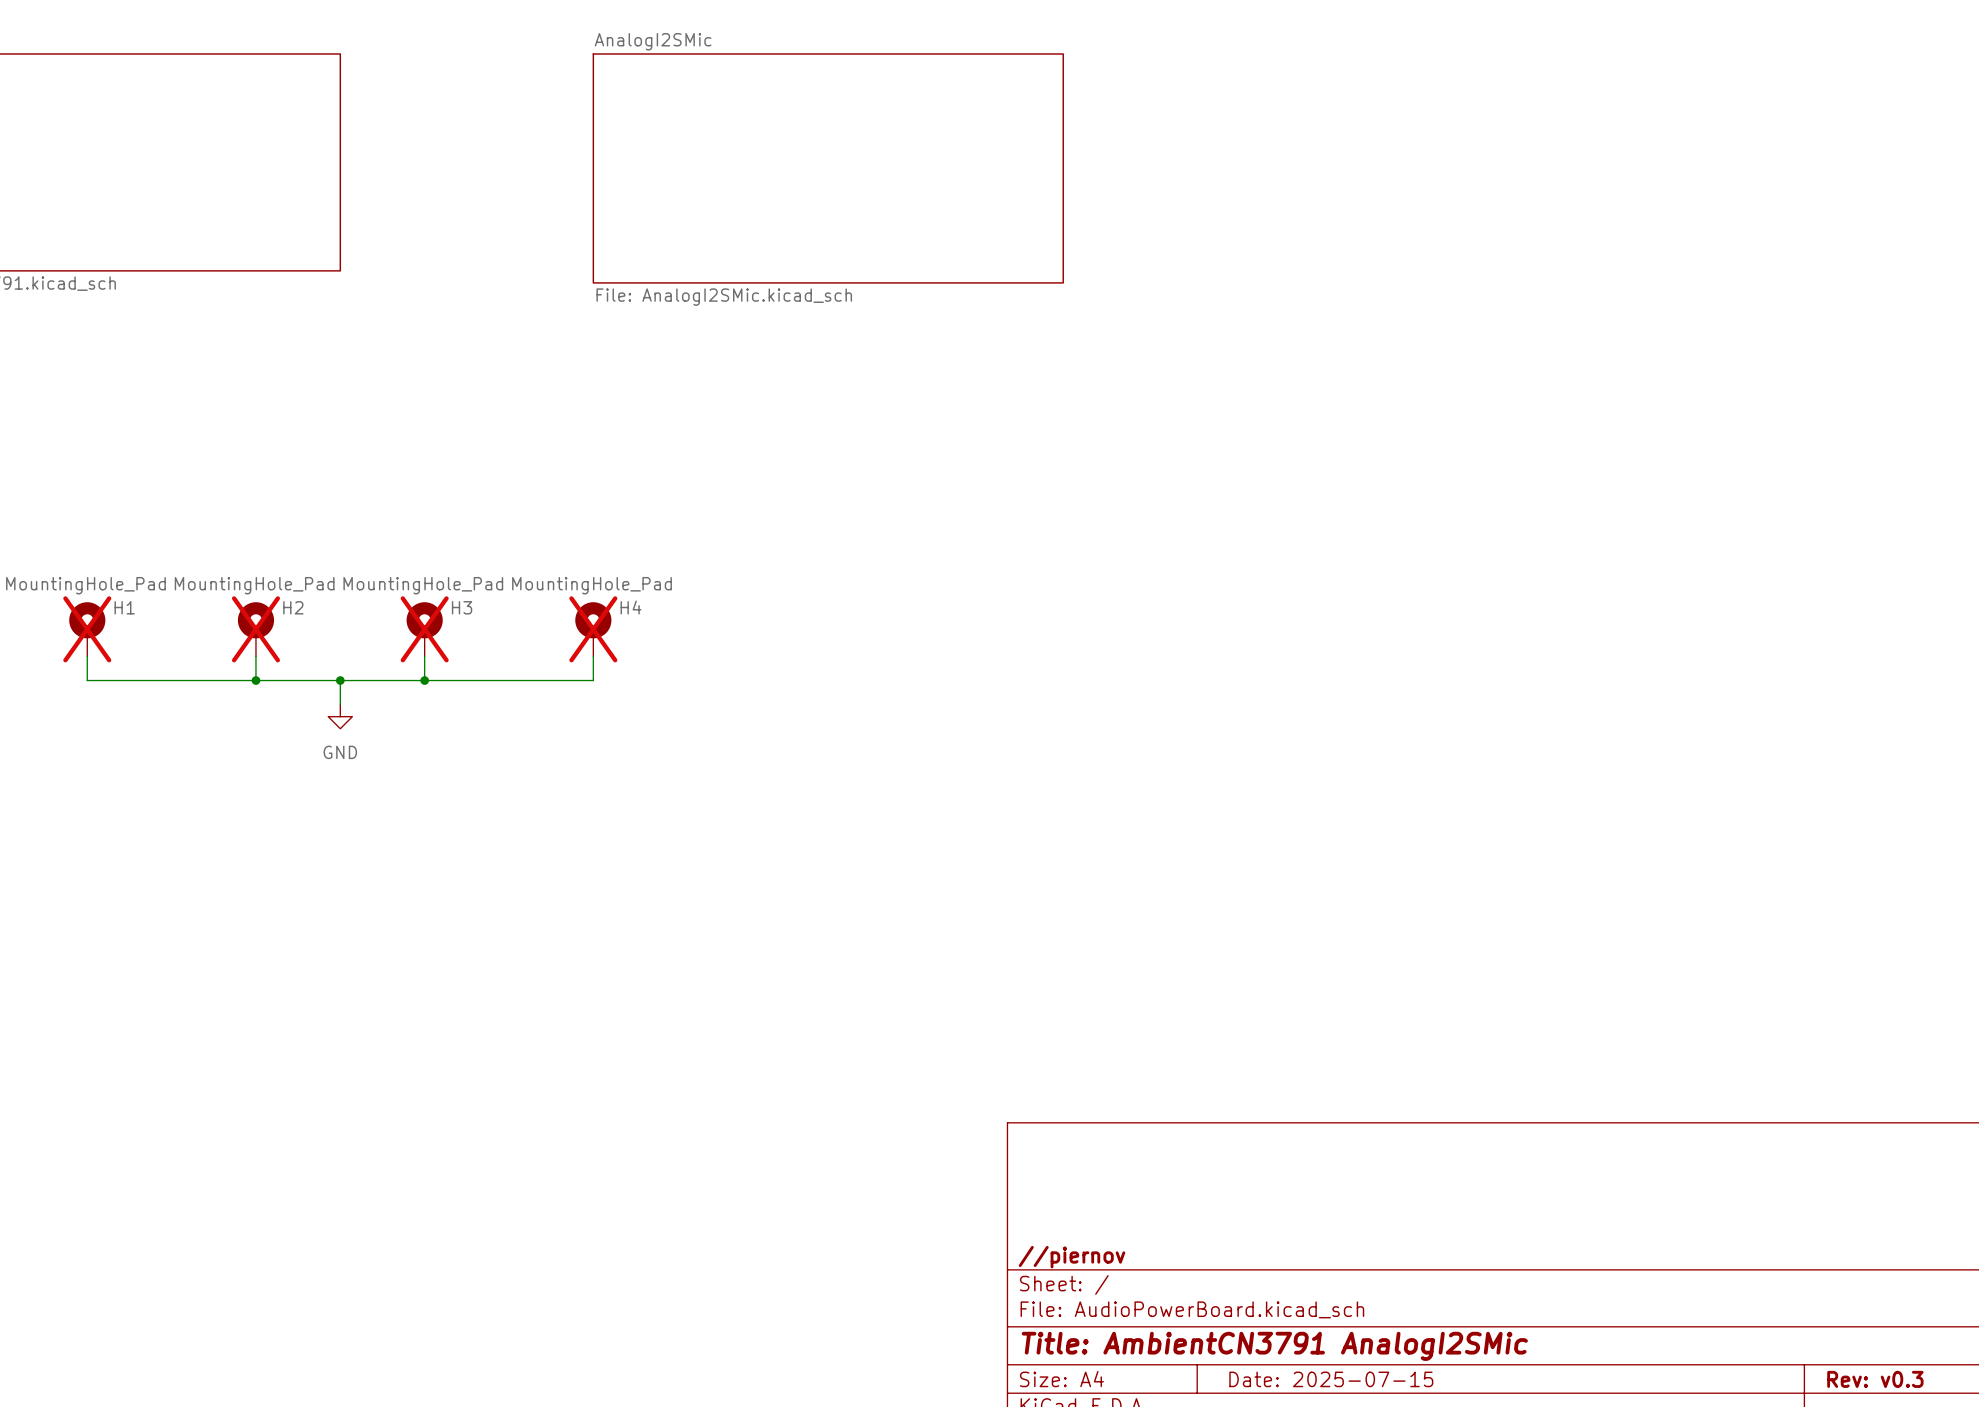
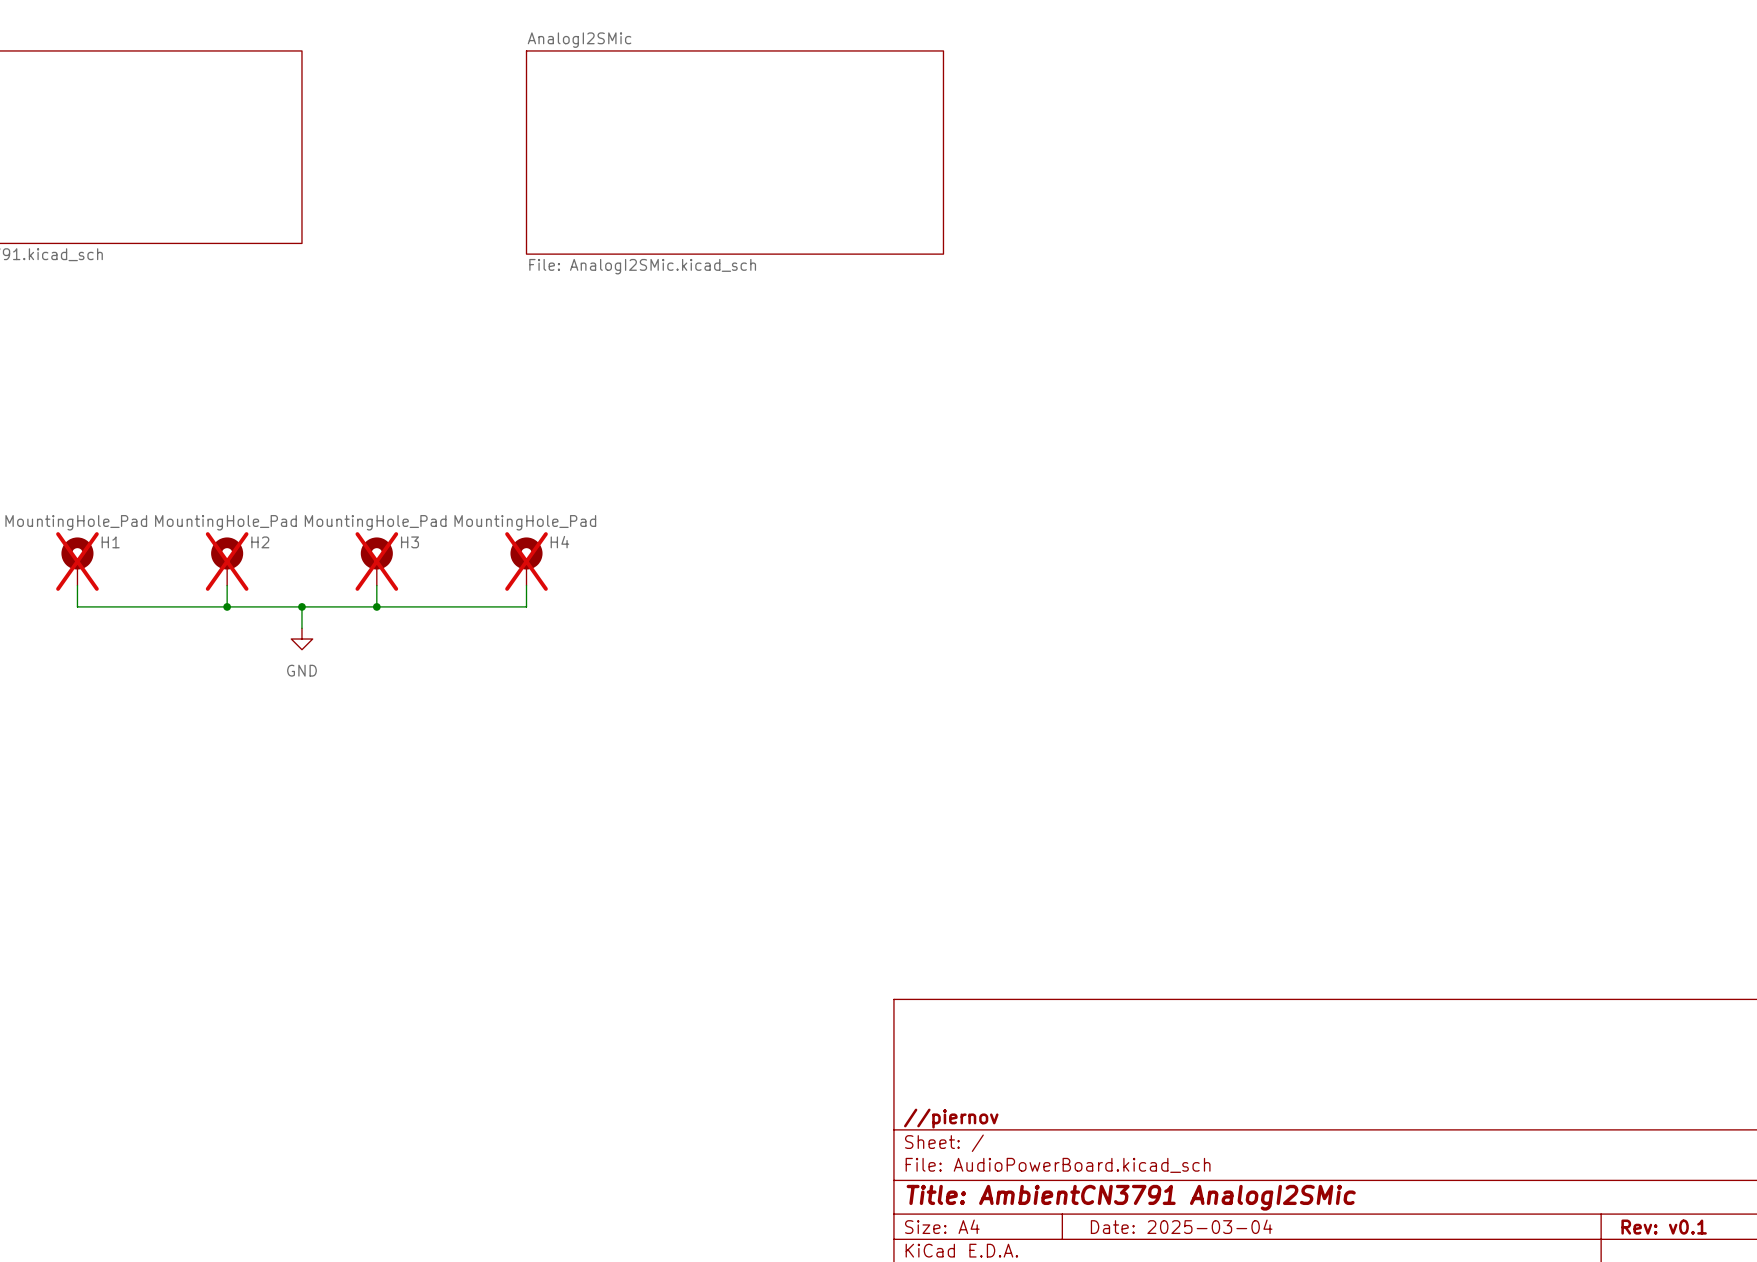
title block: Date: 2025-07-15 (1331, 1379) -> Date: 2025-03-04 (1181, 1226)
title block: Rev: v0.3 (1875, 1379) -> Rev: v0.1 (1664, 1227)

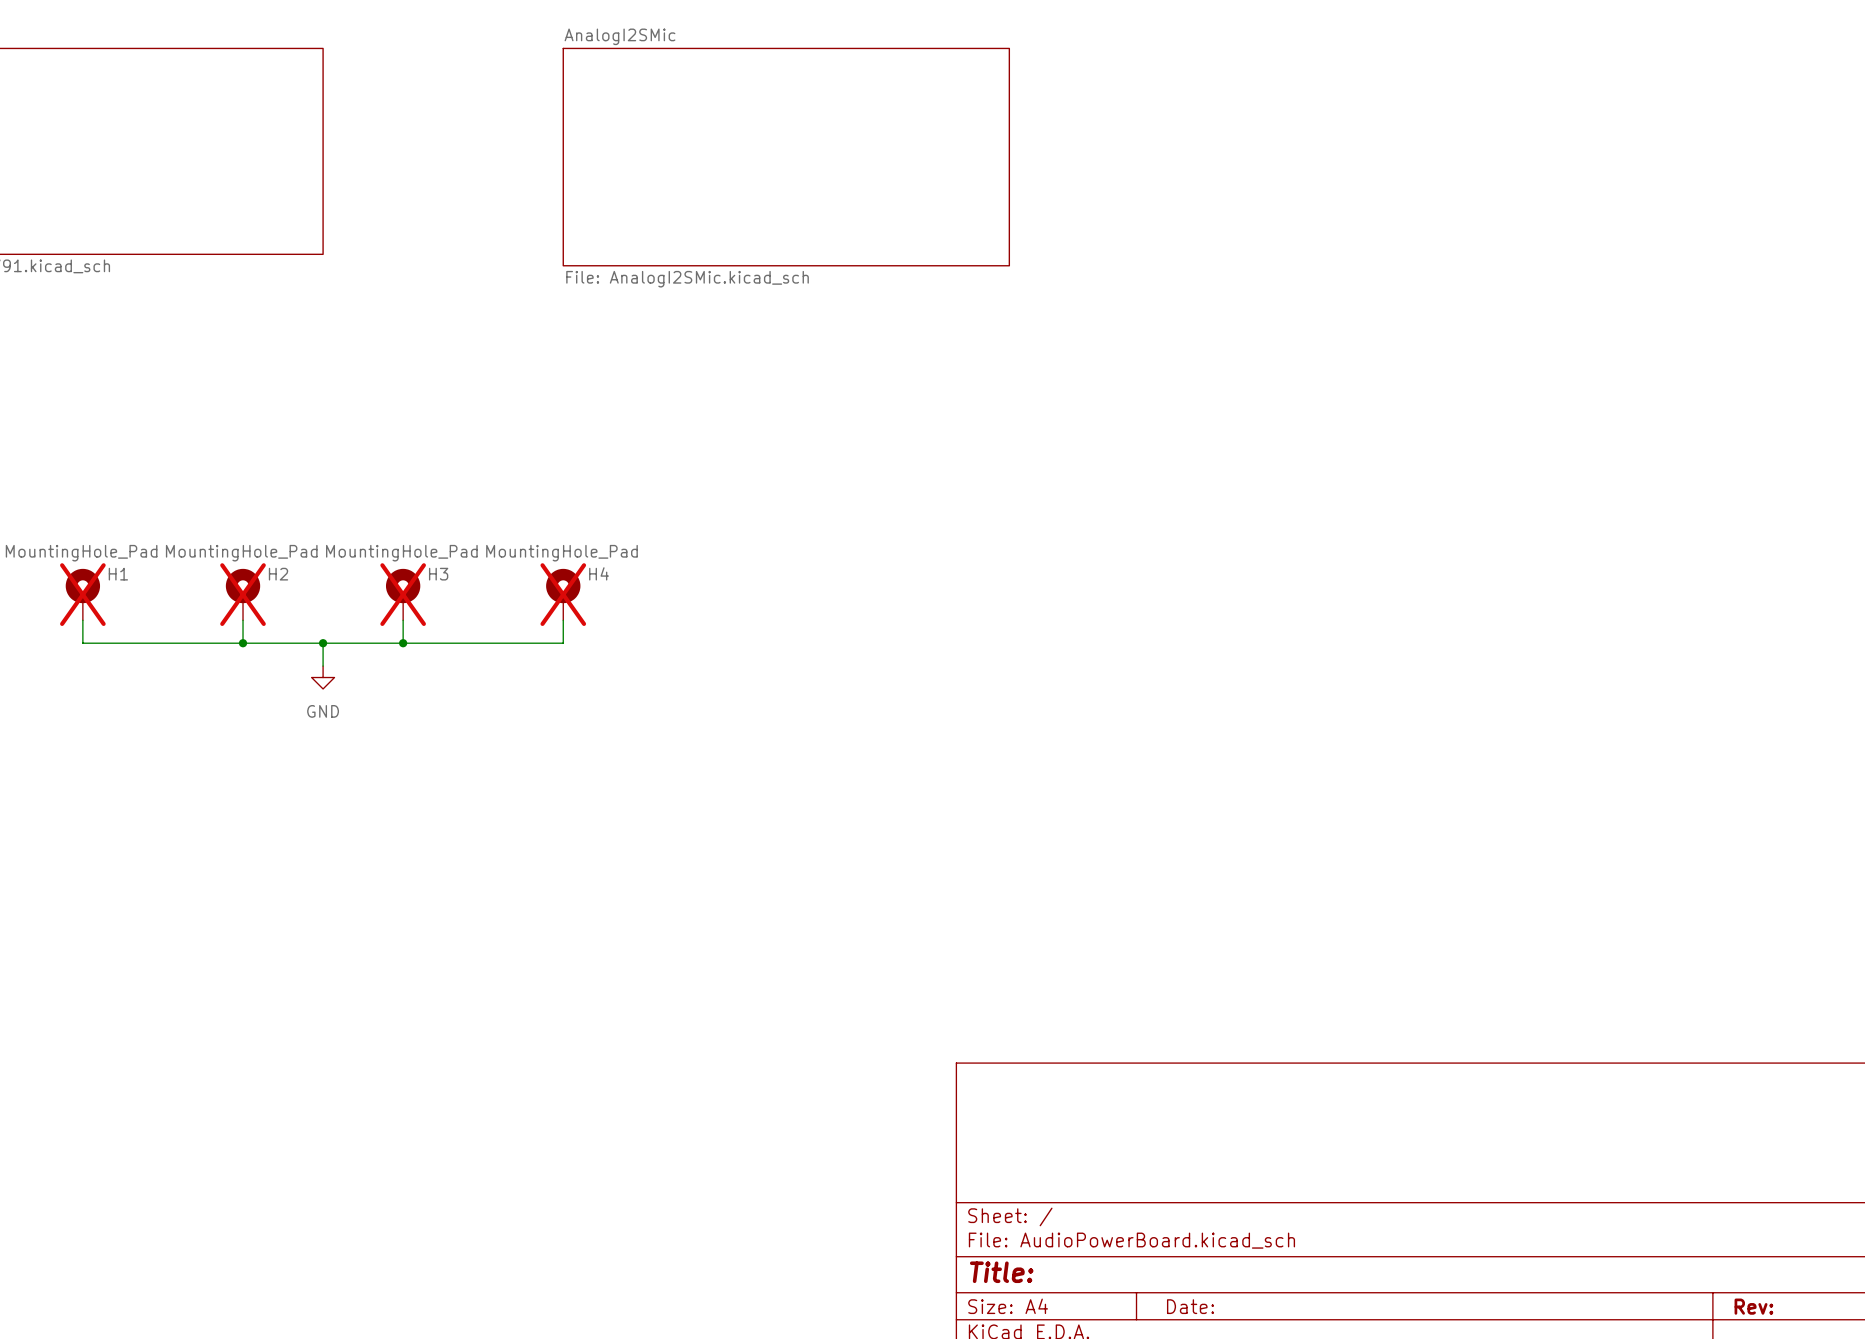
title block: //piernov (951, 1118) -> none
title block: Title: AmbientCN3791 AnalogI2SMic (1131, 1197) -> Title: (1001, 1272)
title block: Date: 2025-03-04 (1181, 1226) -> Date: (1190, 1306)
title block: Rev: v0.1 (1664, 1227) -> Rev: (1753, 1306)

